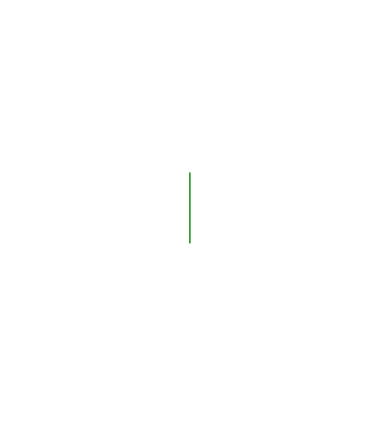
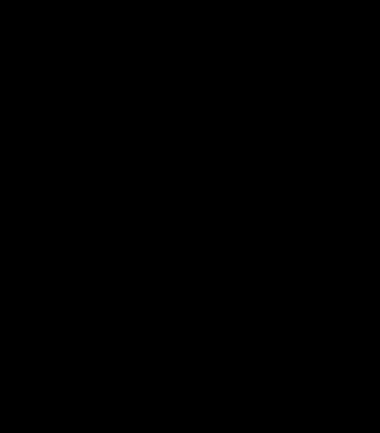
wire: (189, 172) (189, 242) -> none

